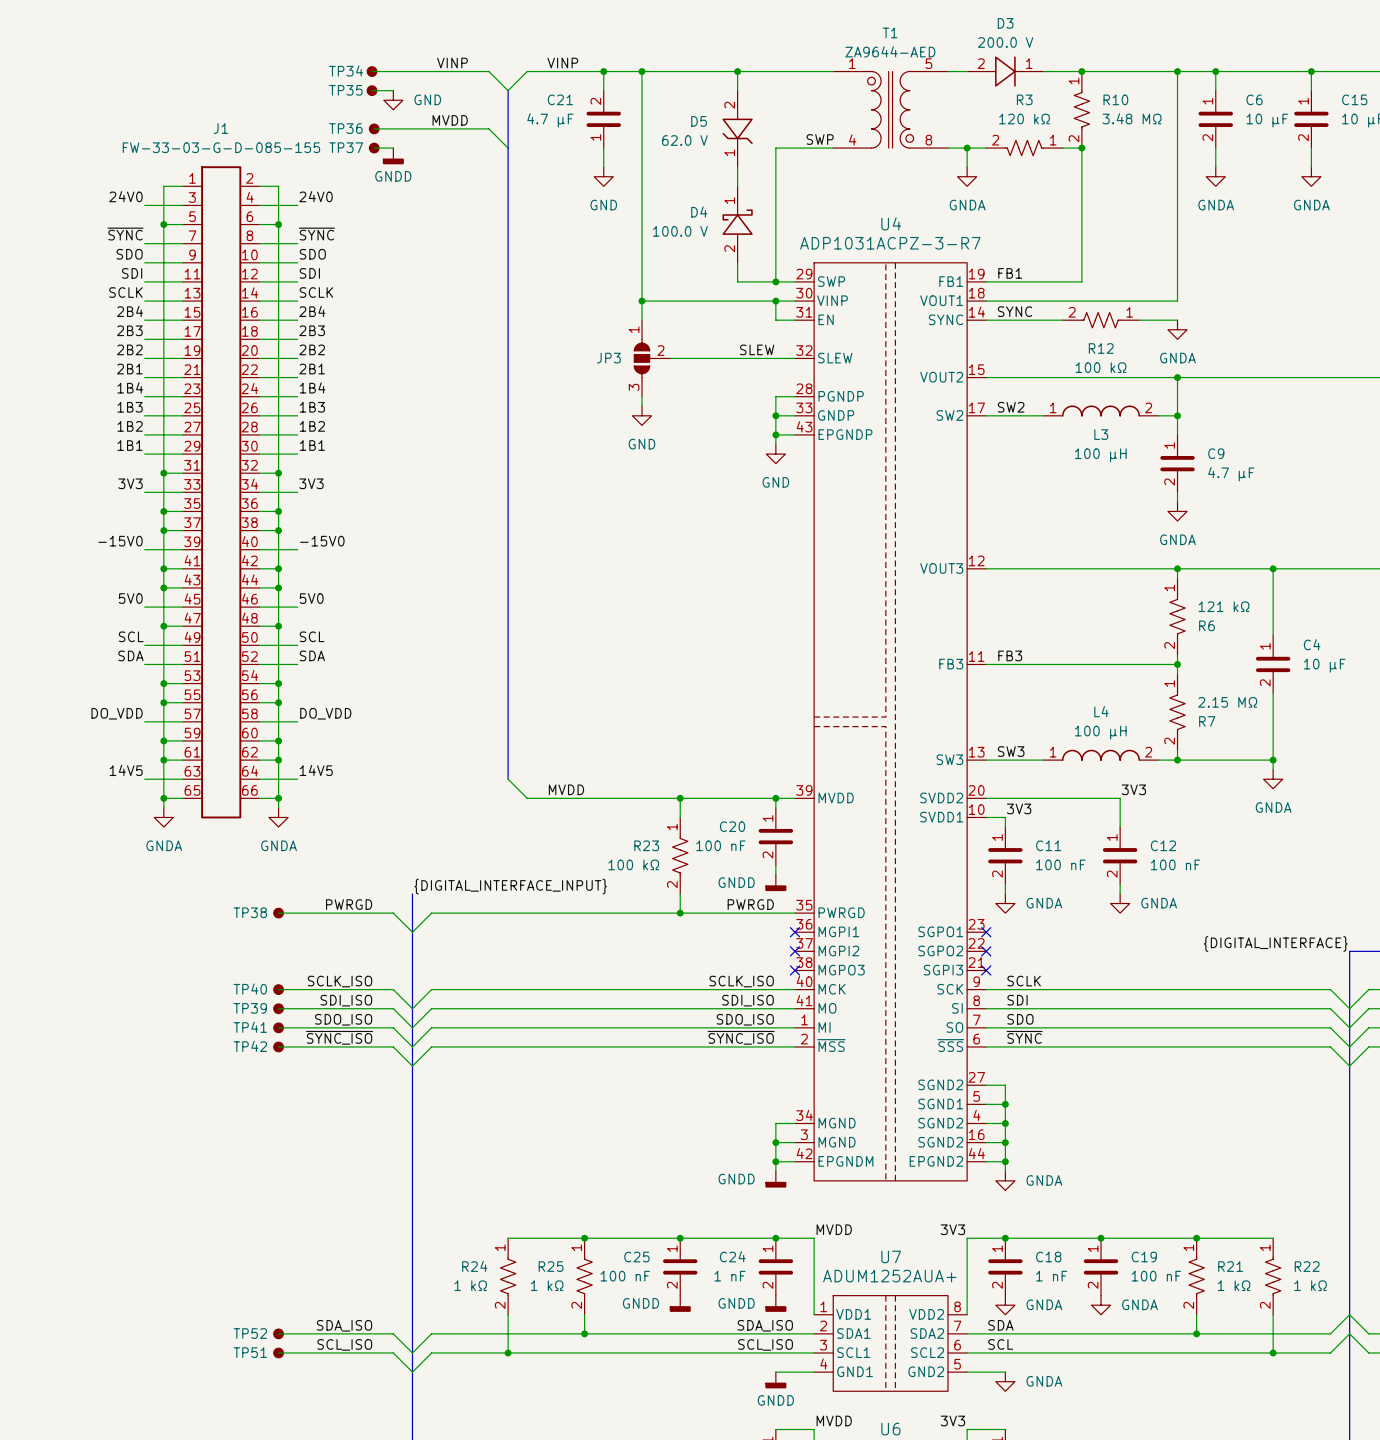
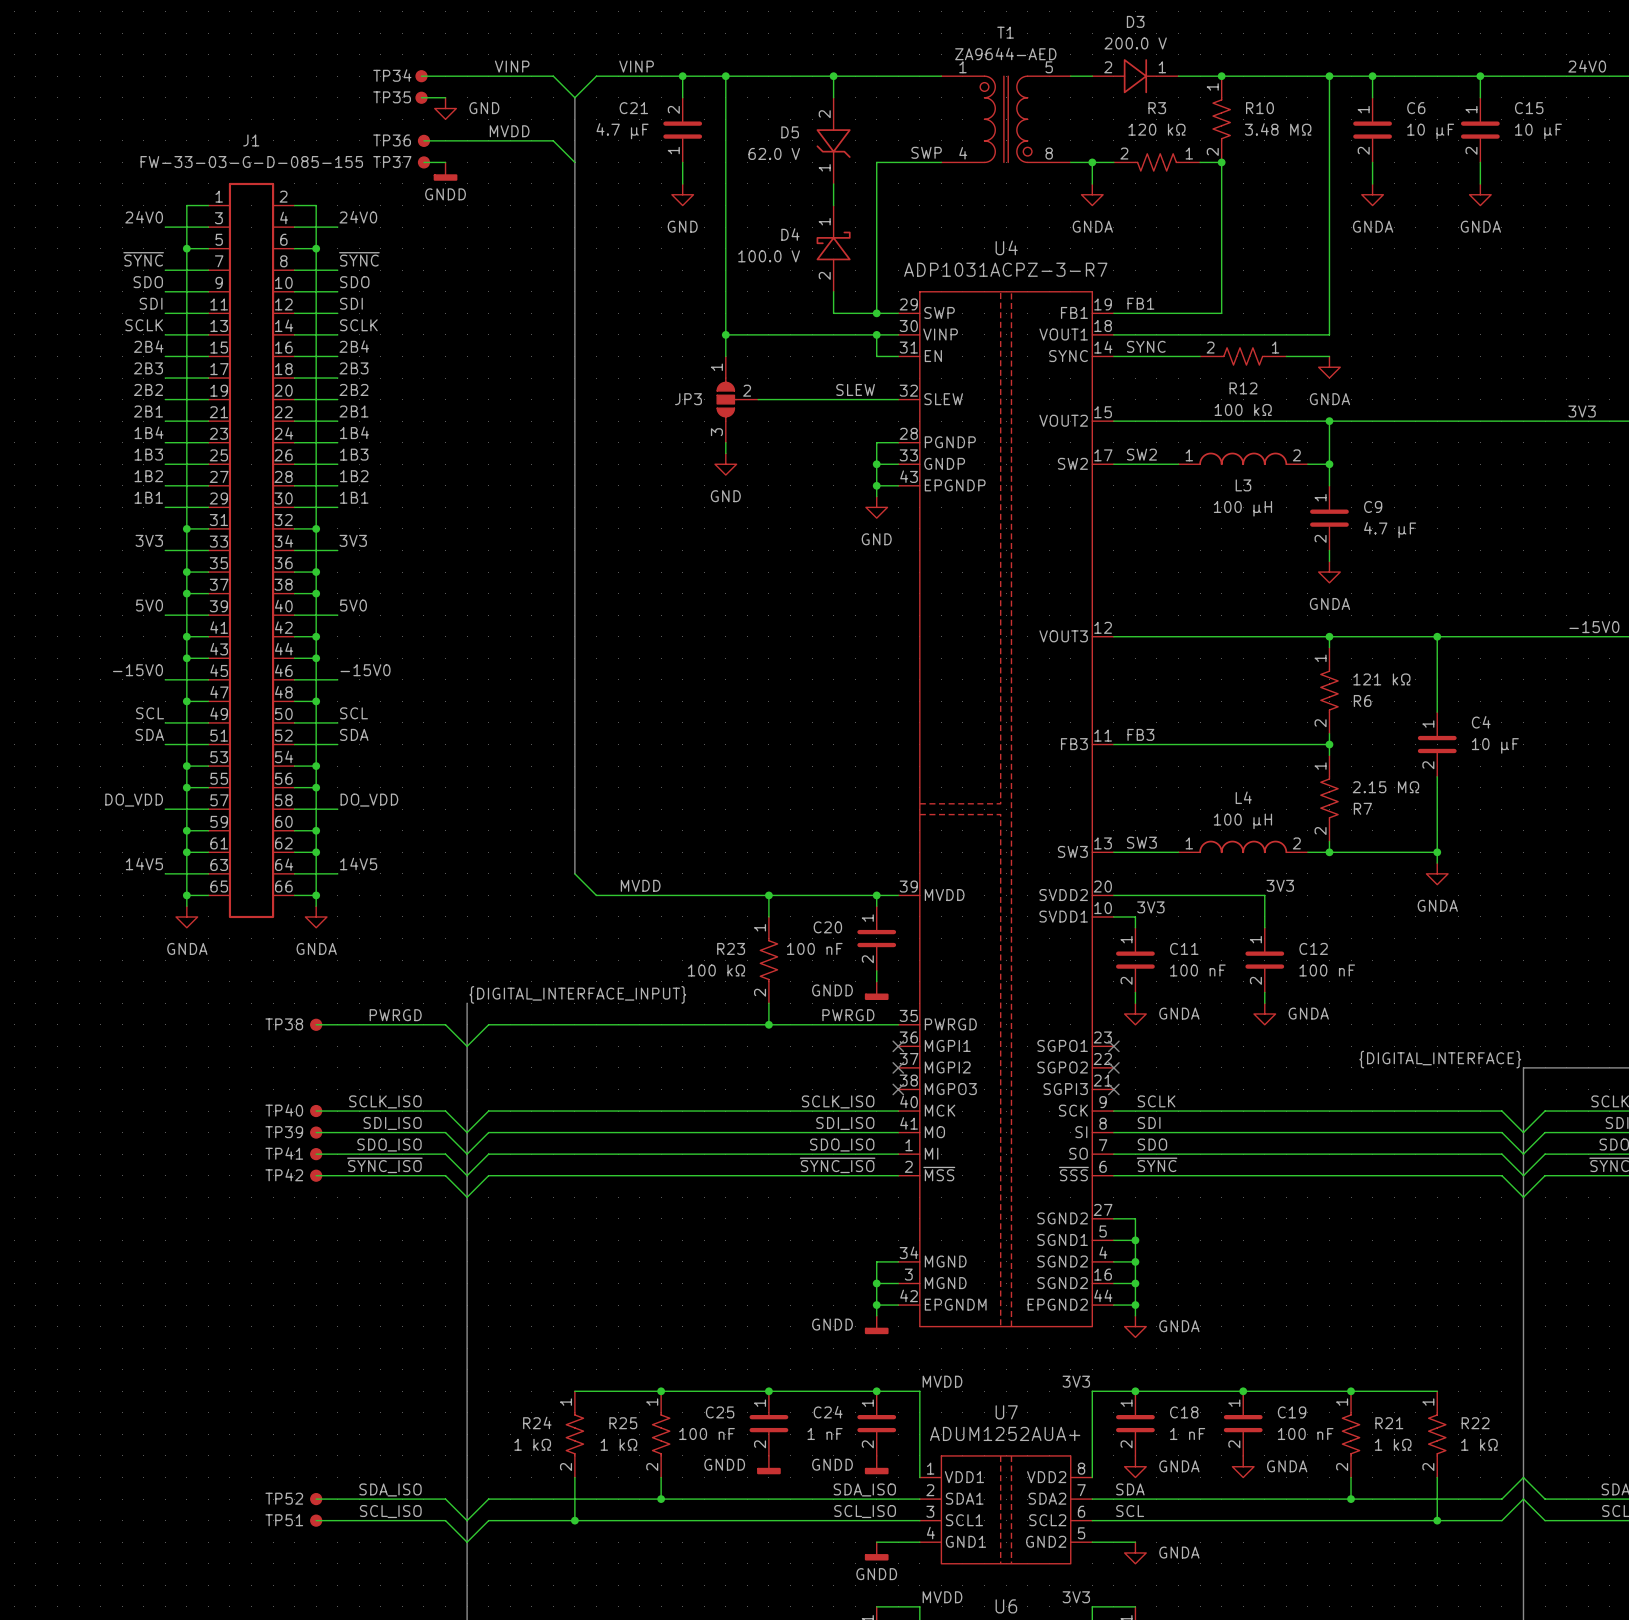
label: -15V0 (120, 541) -> 5V0 (149, 605)
label: -15V0 (322, 541) -> 5V0 (353, 605)
label: 5V0 (130, 598) -> -15V0 (137, 670)
label: 5V0 (311, 598) -> -15V0 (365, 670)

